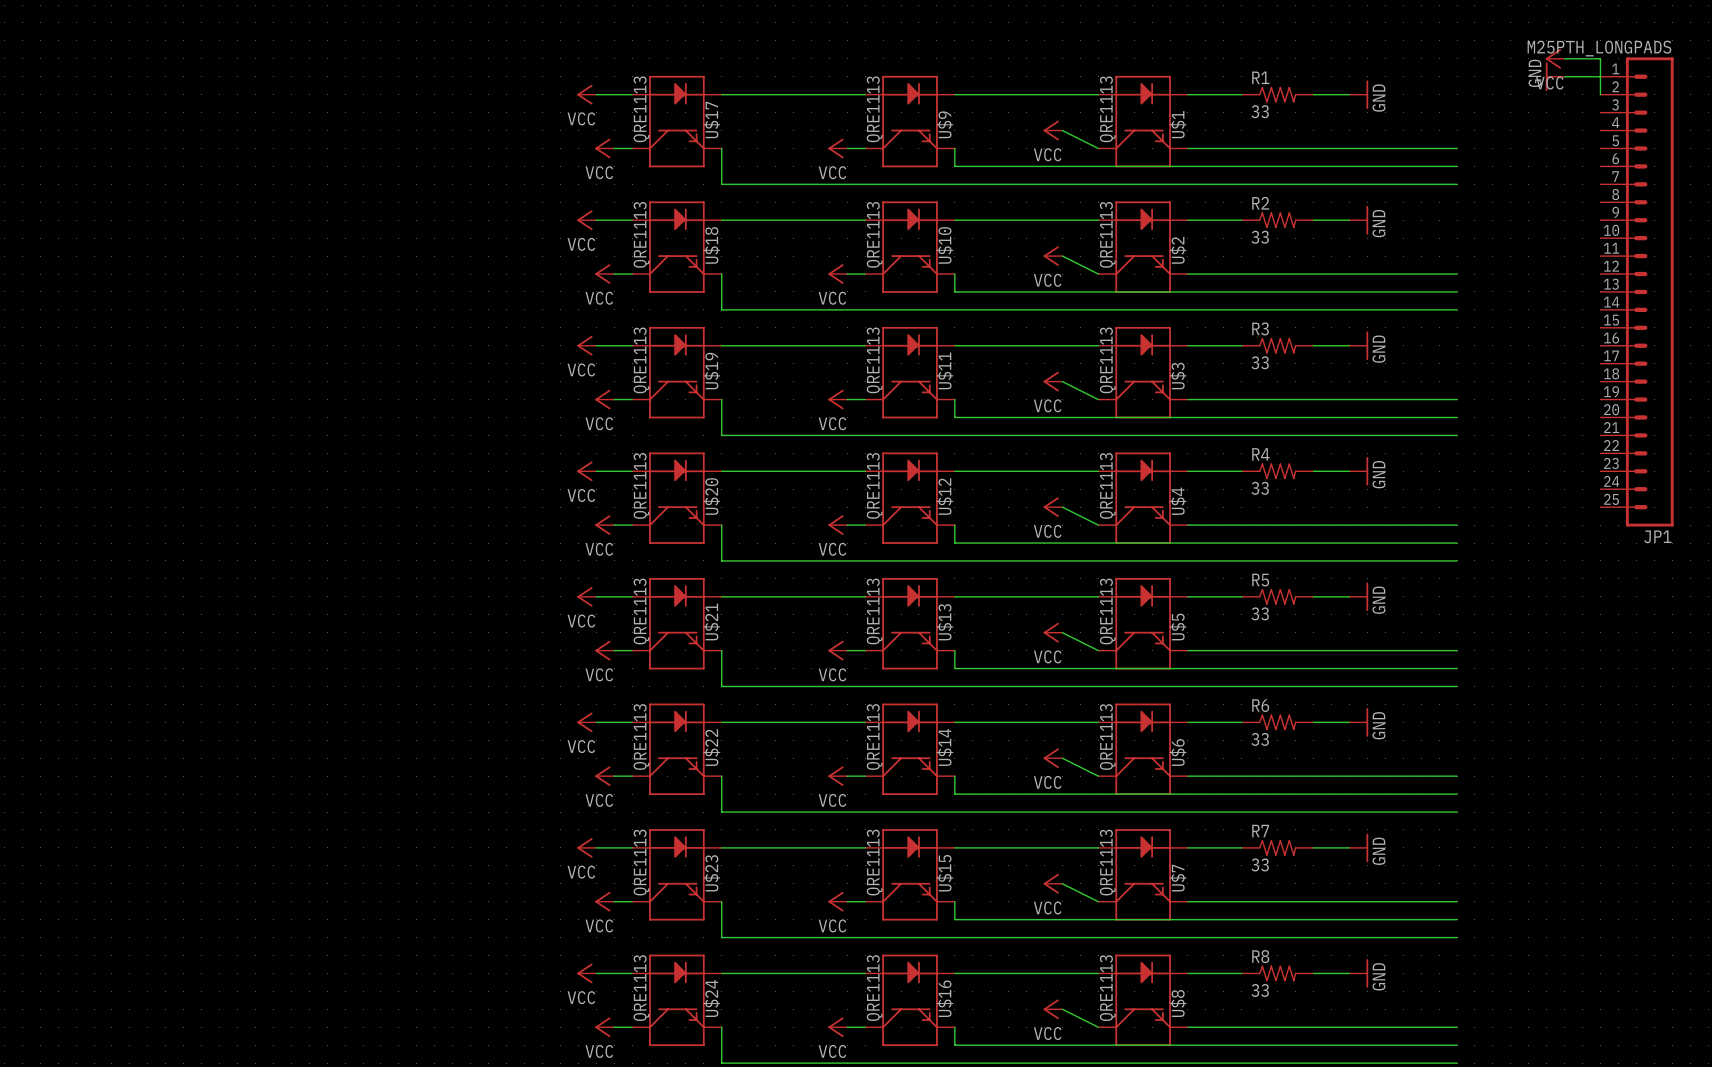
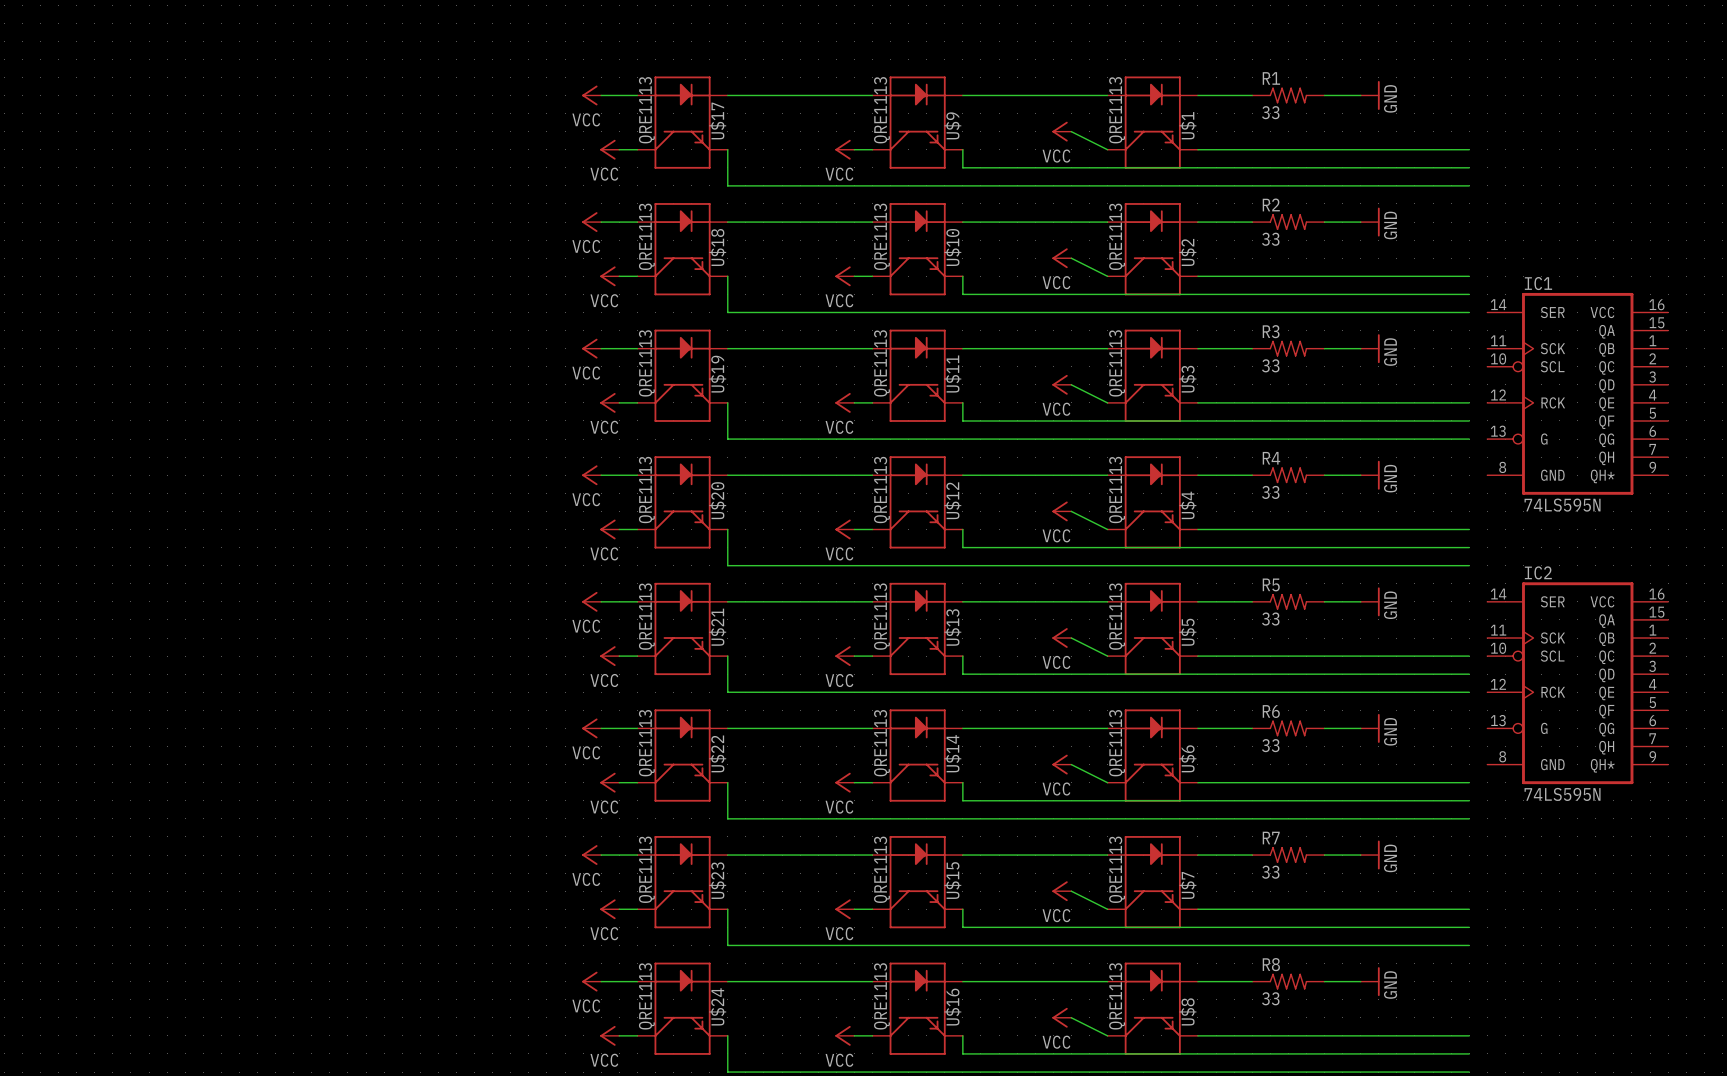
power symbol: VCC (1555, 58) -> none
wire: (1564, 58) (1600, 58) (1600, 94) -> none
power symbol: GND (1555, 76) -> none
wire: (1564, 76) (1600, 76) -> none
JP1: M25PTH_LONGPADS (1637, 291) -> none
IC1: none -> 74LS595N (1577, 393)
IC2: none -> 74LS595N (1577, 683)

